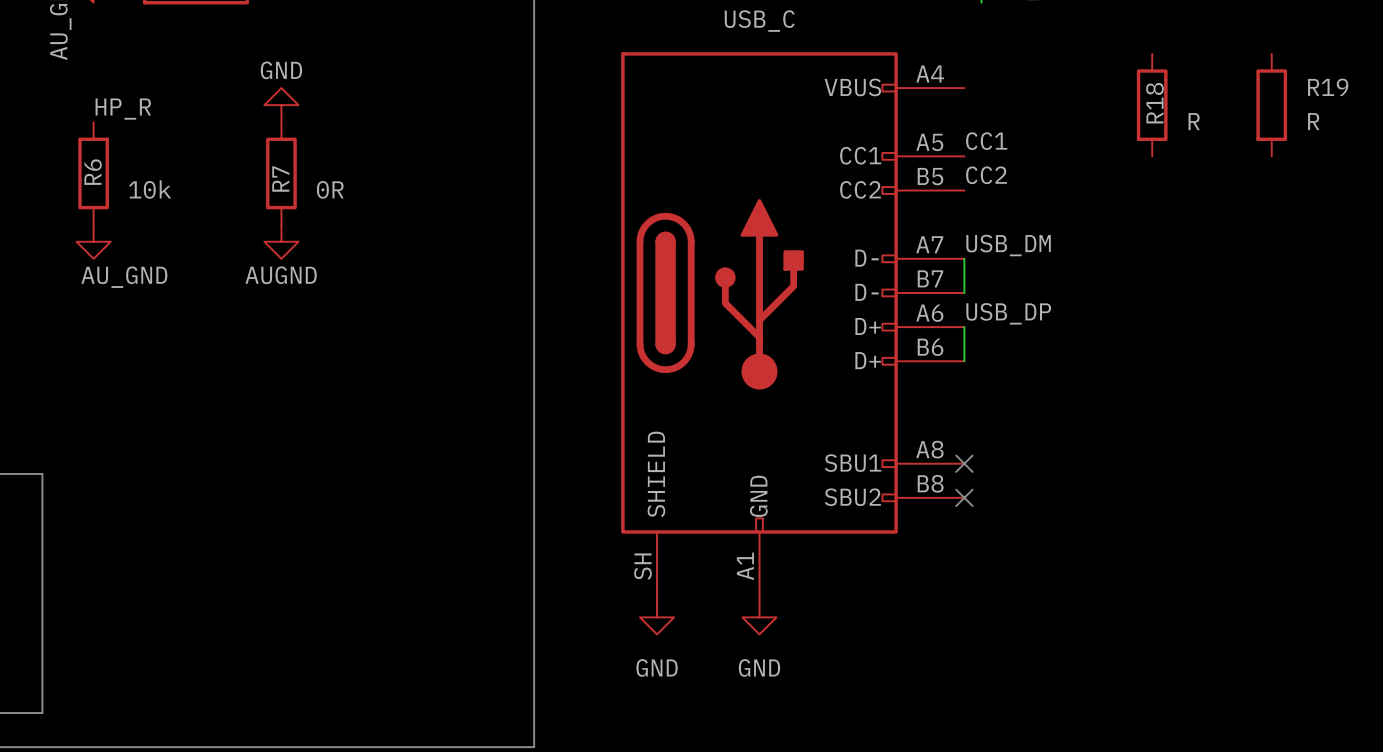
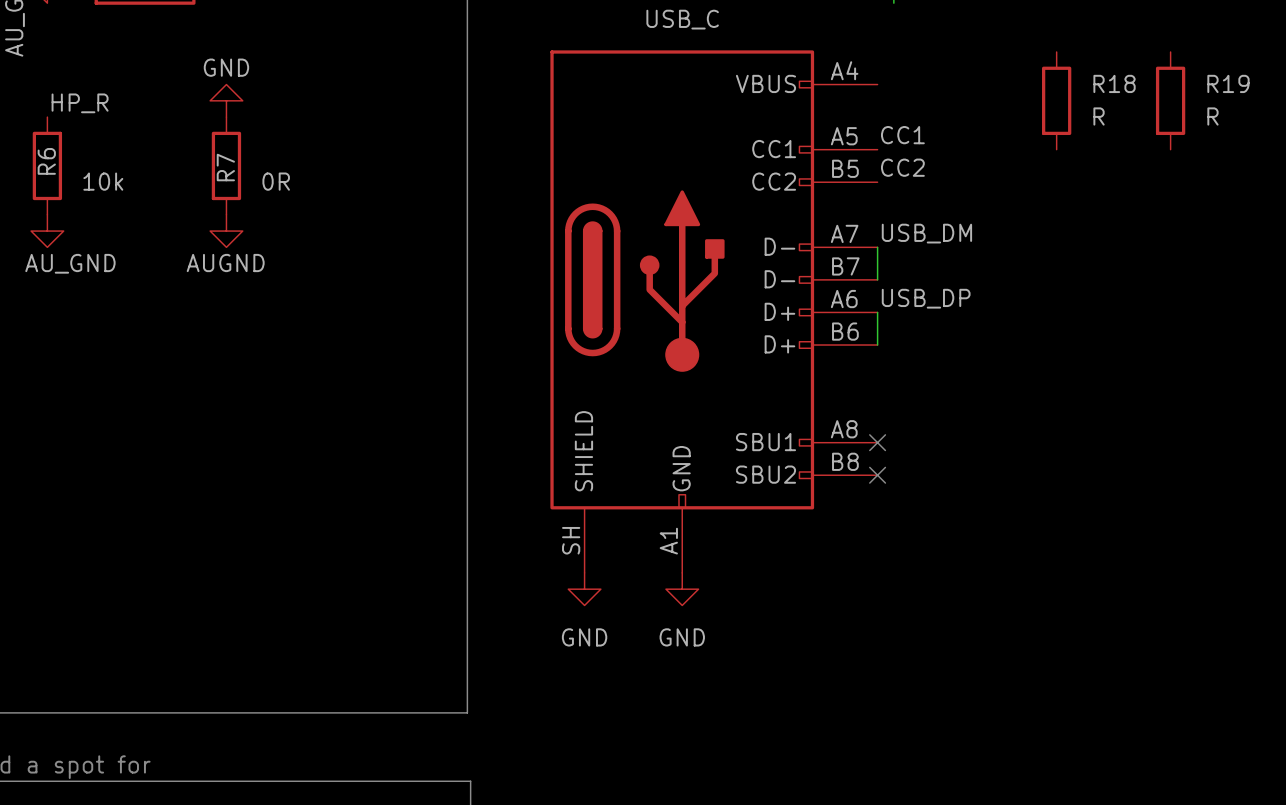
R18 name rotation: 0° (1154, 103) -> 90° clockwise (1114, 83)
R18 name position: R18 (1154, 103) -> R18 (1114, 83)

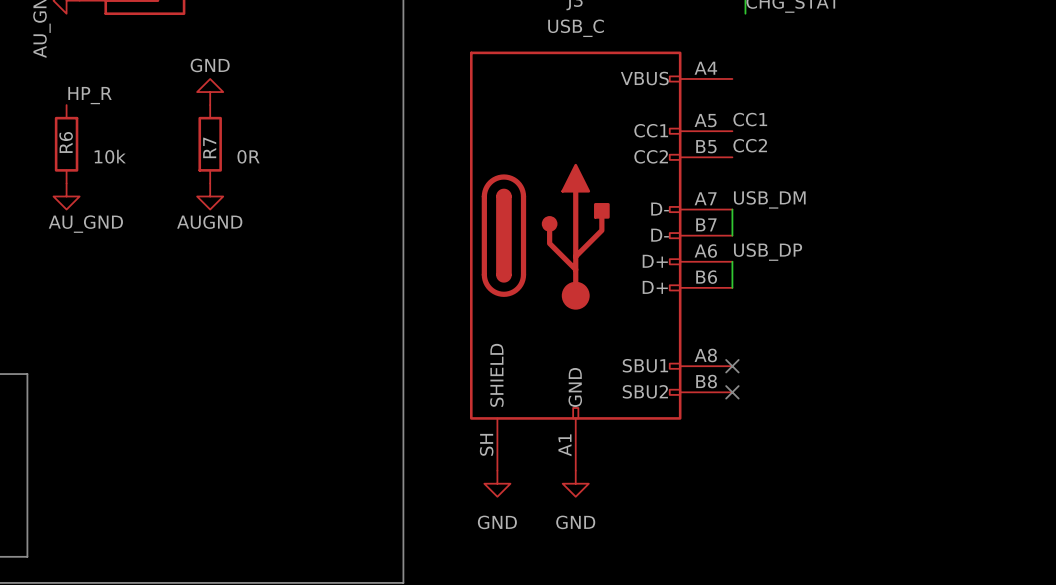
R18: R (1056, 100) -> none
R19: R (1170, 100) -> none

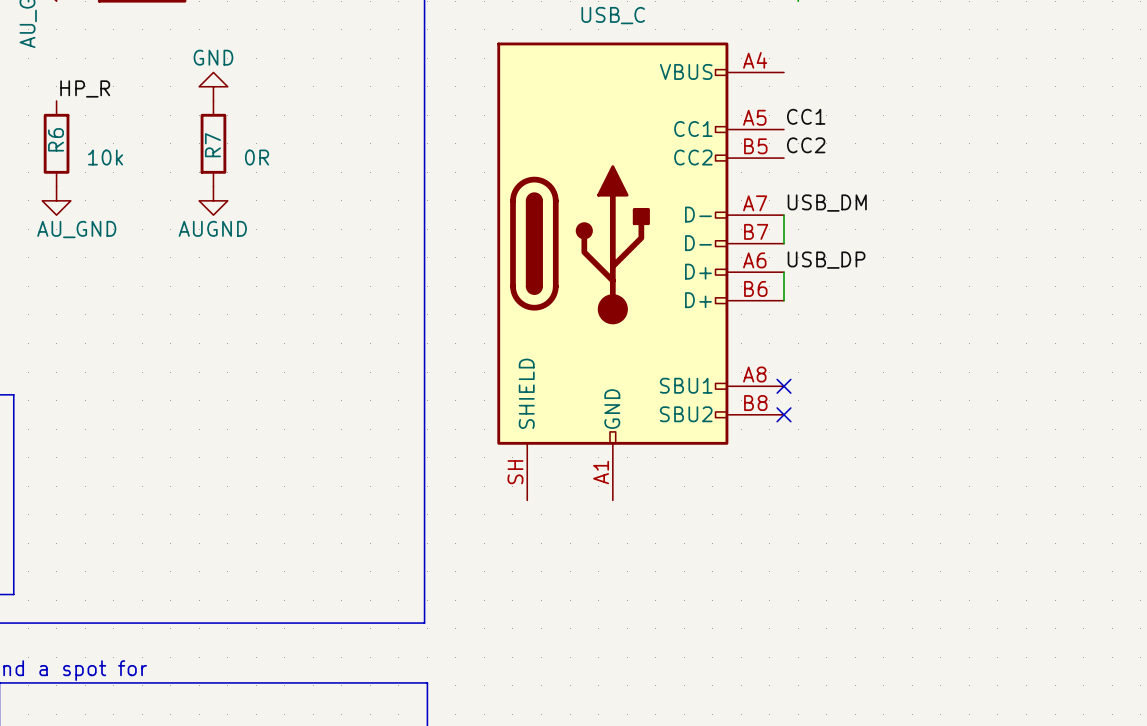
power symbol: GND (497, 483) -> none
power symbol: GND (575, 483) -> none

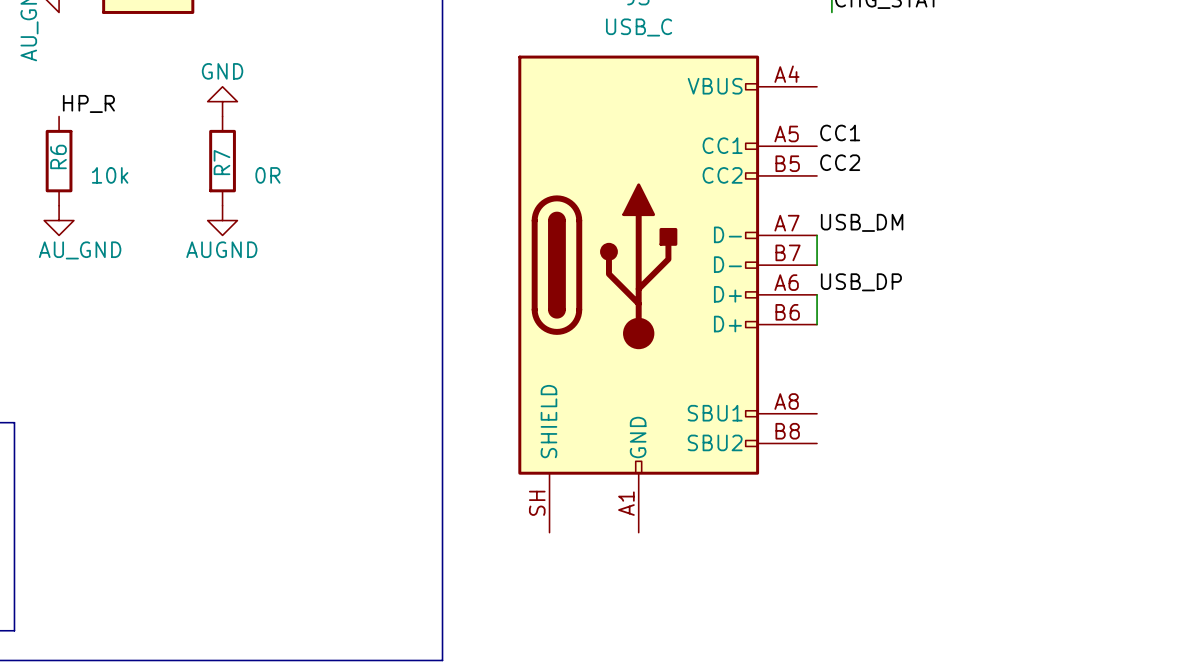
no-connect mark: (783, 386) -> none
no-connect mark: (783, 414) -> none

